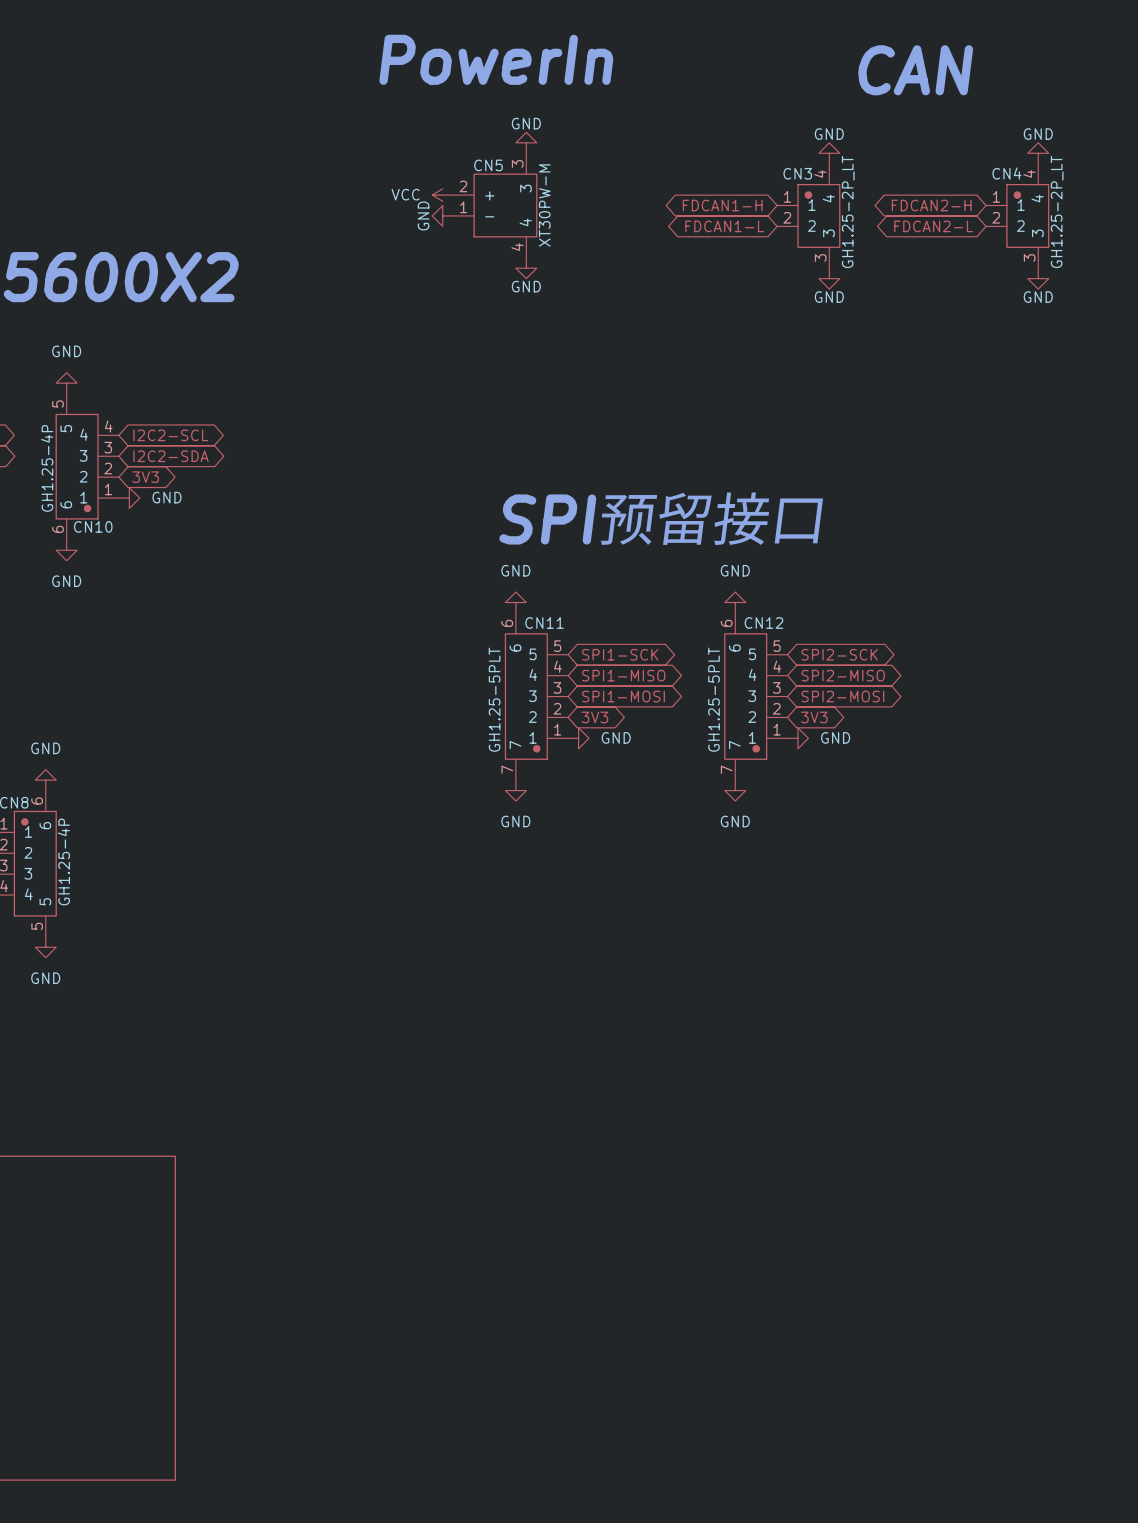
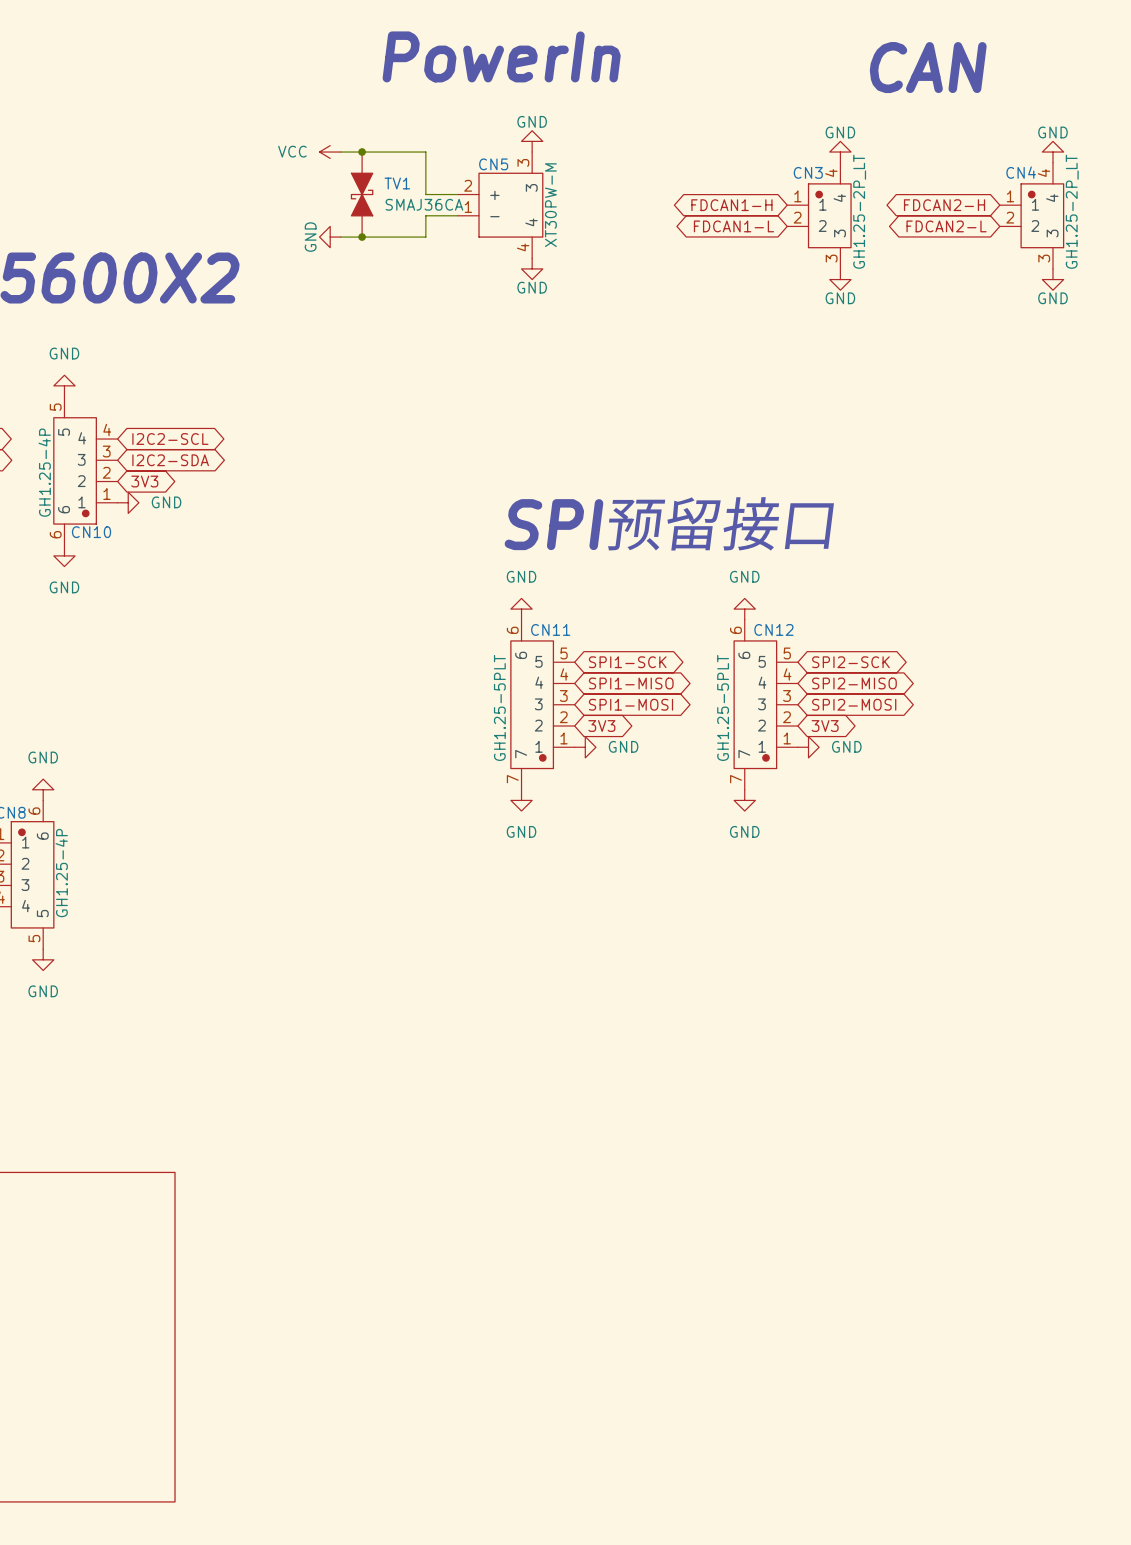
wire: none -> (340, 152) (425, 152) (425, 194) (457, 194)
junction: none -> (362, 152)
TV1: none -> SMAJ36CA (362, 194)
power symbol position: VCC (442, 195) -> VCC (330, 152)
power symbol position: GND (442, 215) -> GND (330, 237)
wire: none -> (457, 215) (425, 215) (425, 237) (340, 237)
junction: none -> (362, 237)

